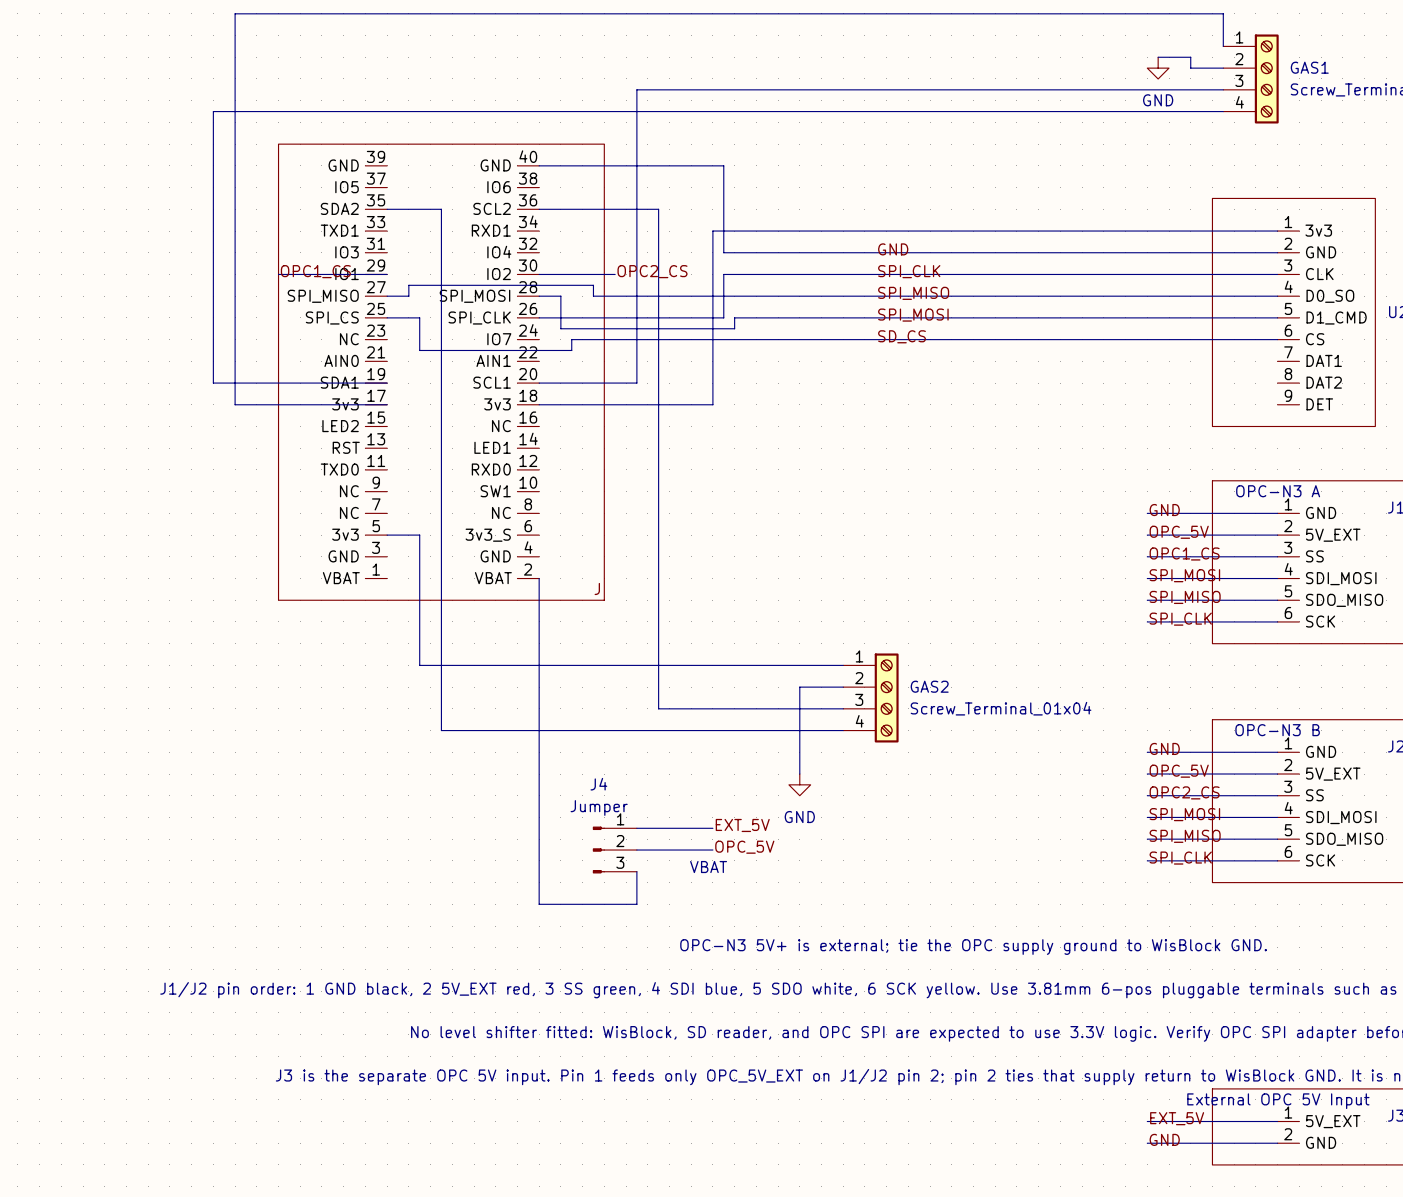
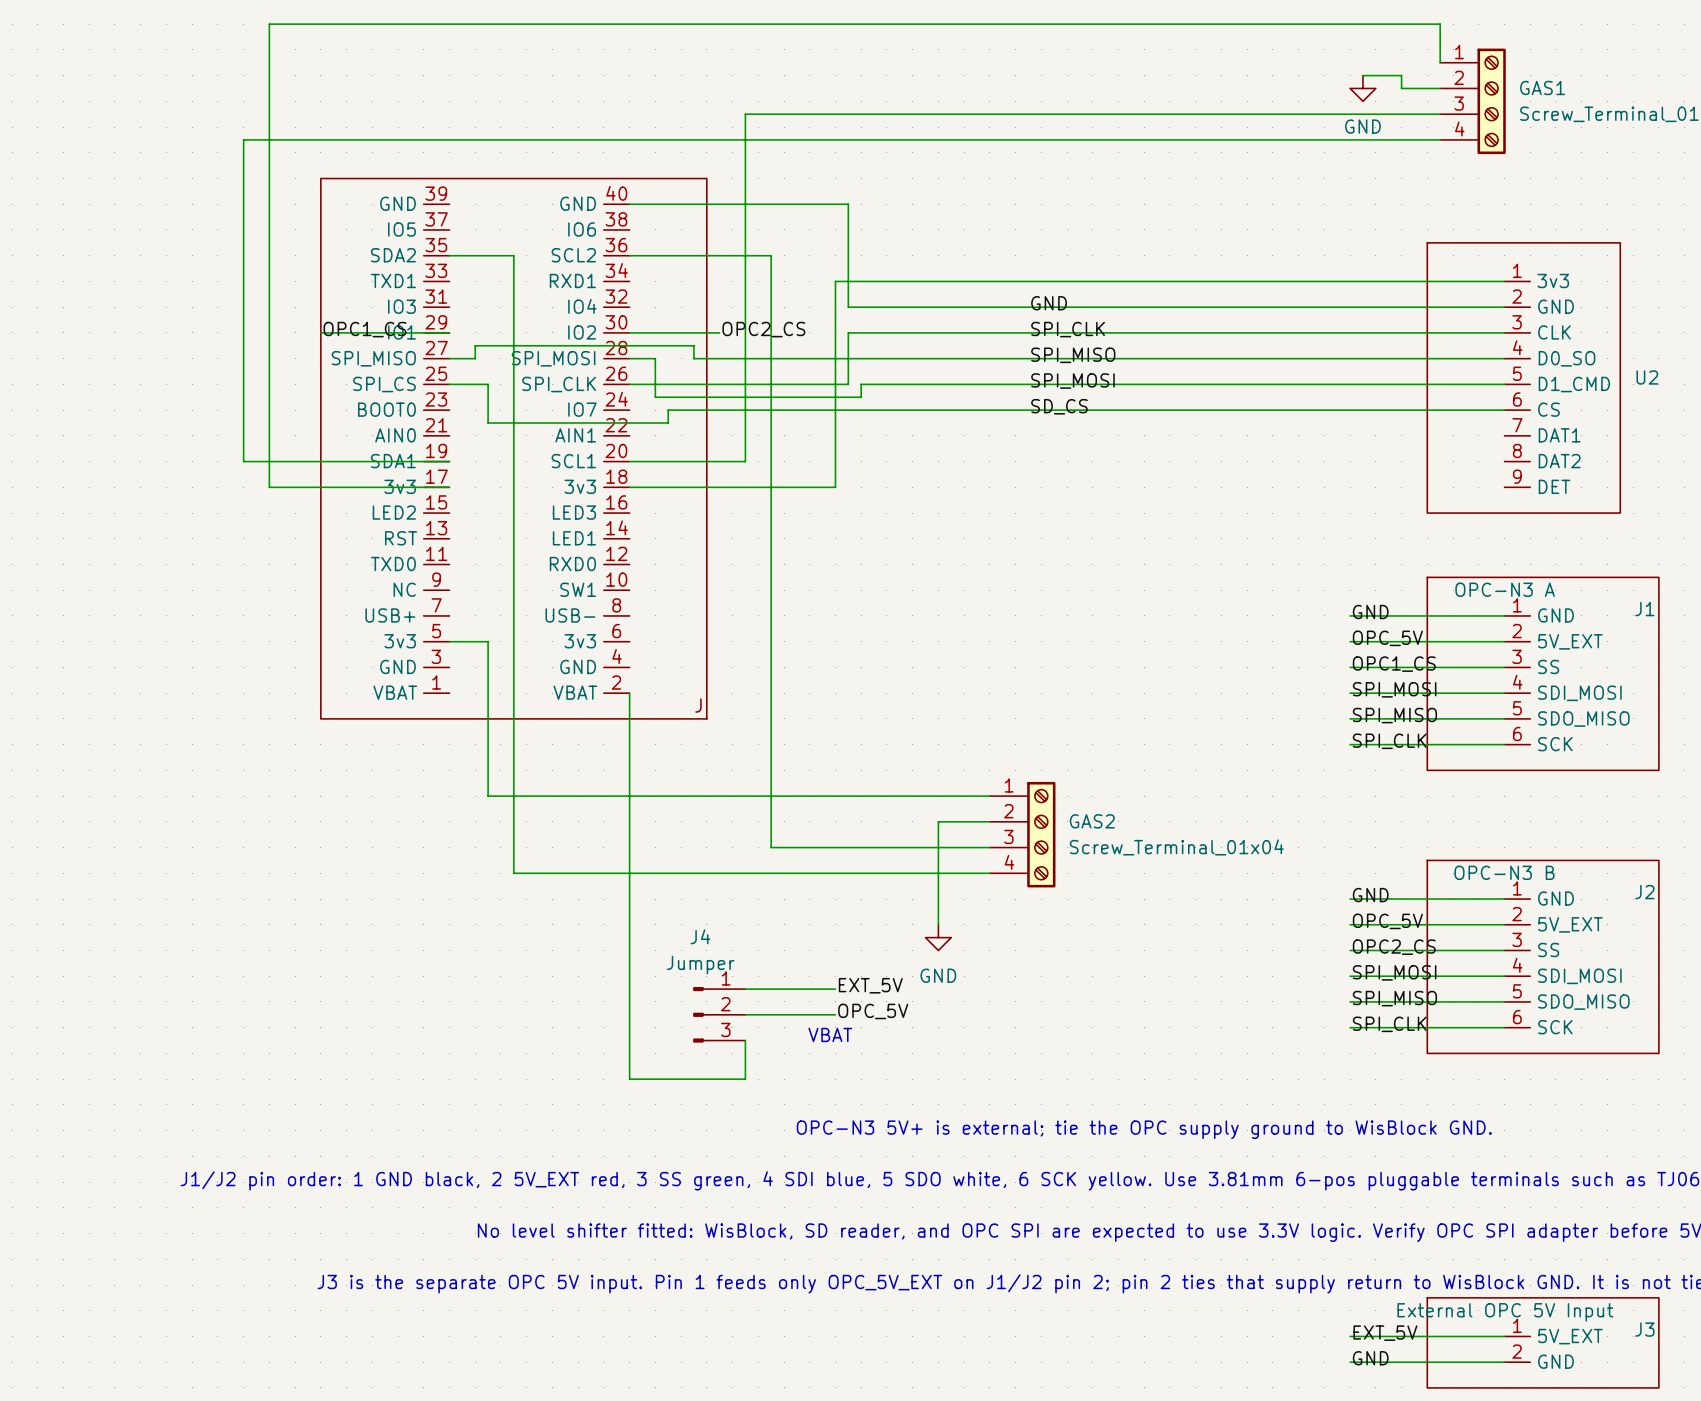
part pin name: NC (349, 339) -> BOOT0 (386, 409)
part pin name: NC (501, 426) -> LED3 (574, 512)
part pin name: NC (349, 512) -> USB+ (390, 615)
part pin name: NC (501, 512) -> USB- (570, 615)
part pin name: 3v3_S (488, 535) -> 3v3 (580, 641)

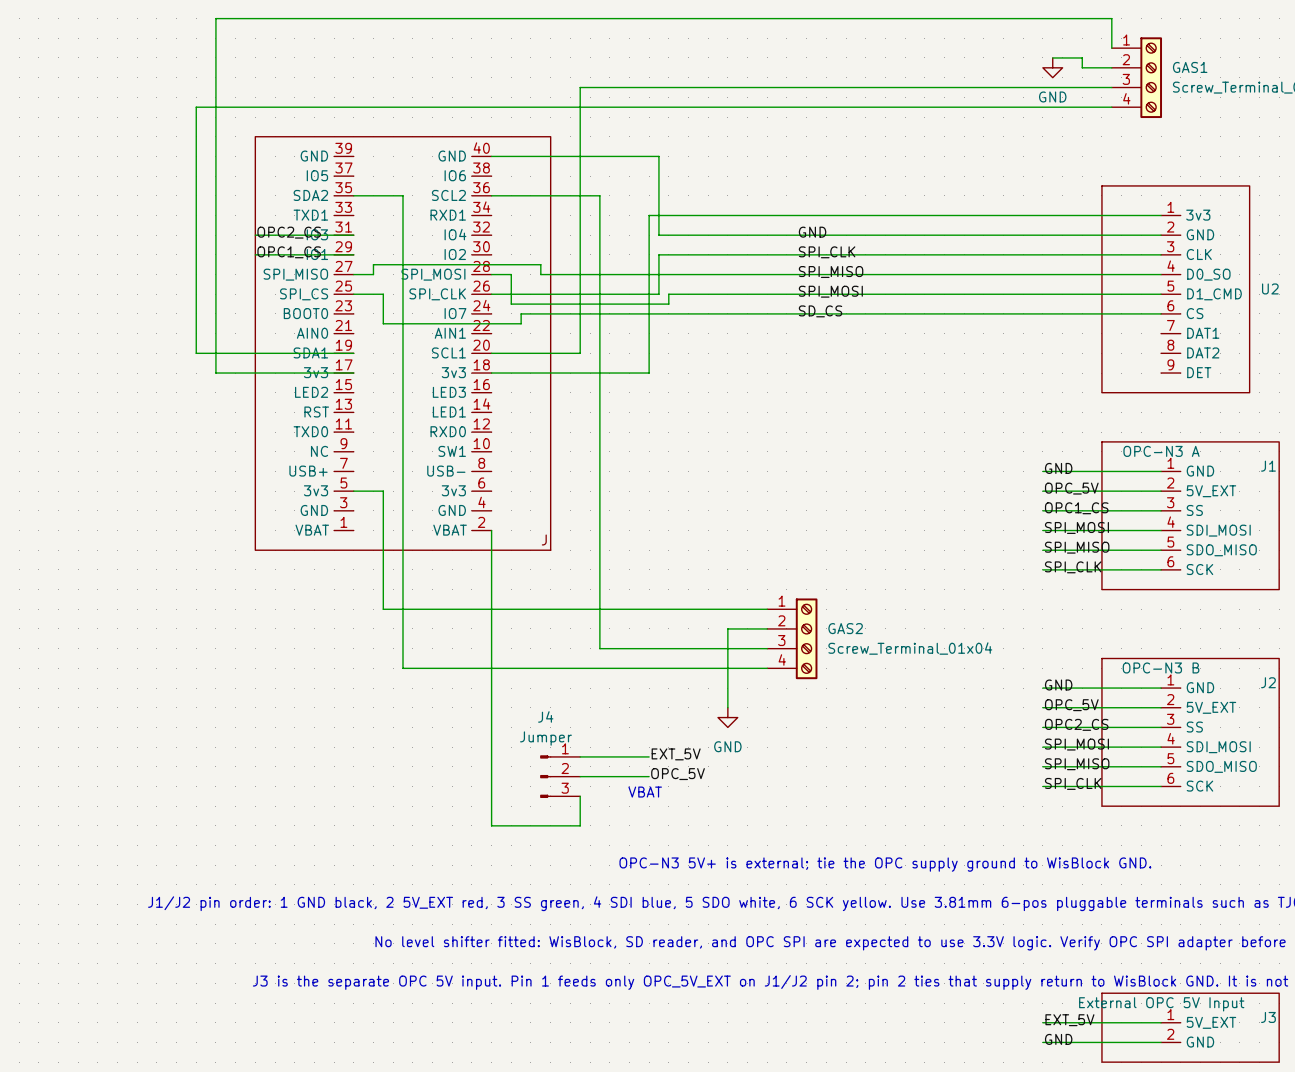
label: none -> OPC2_CS (289, 232)
wire: none -> (255, 235) (353, 235)
label: OPC2_CS (763, 329) -> none
wire: (629, 332) (719, 332) -> none

